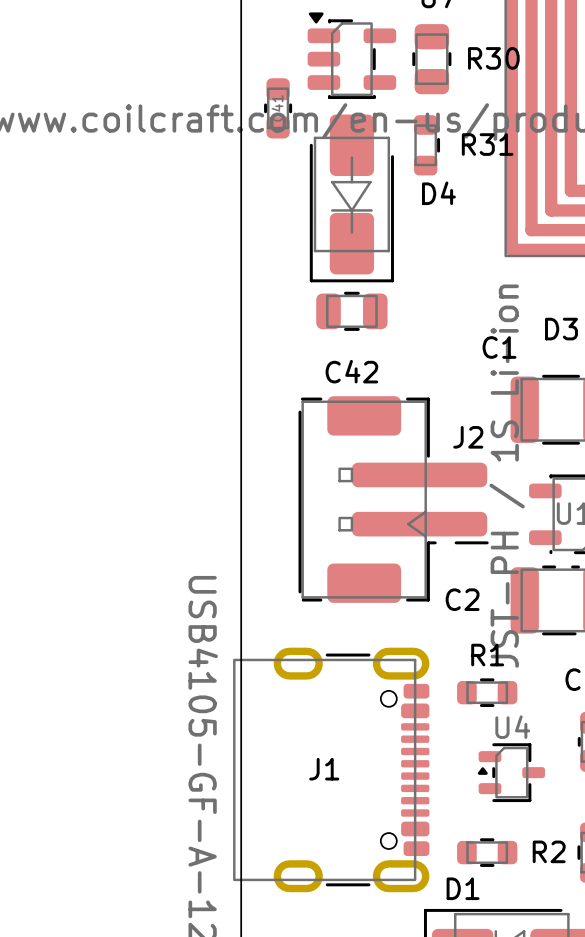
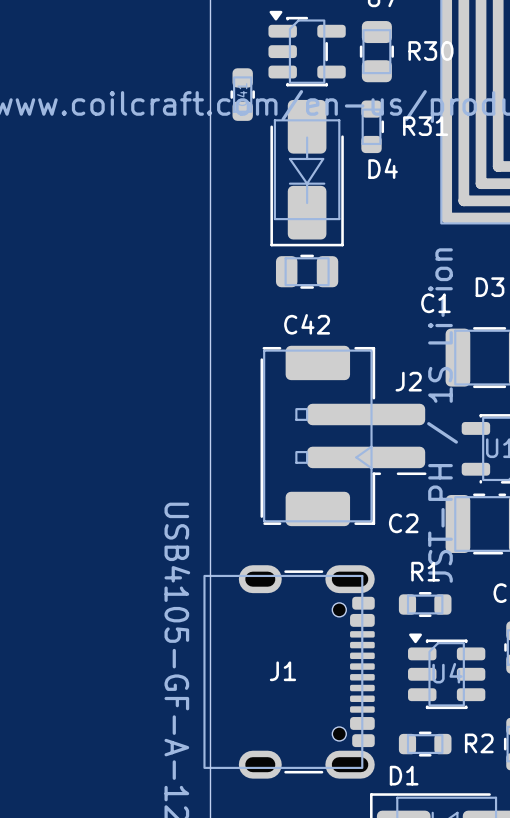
U4 footprint: [477, 743, 546, 803] -> [408, 633, 486, 710]

